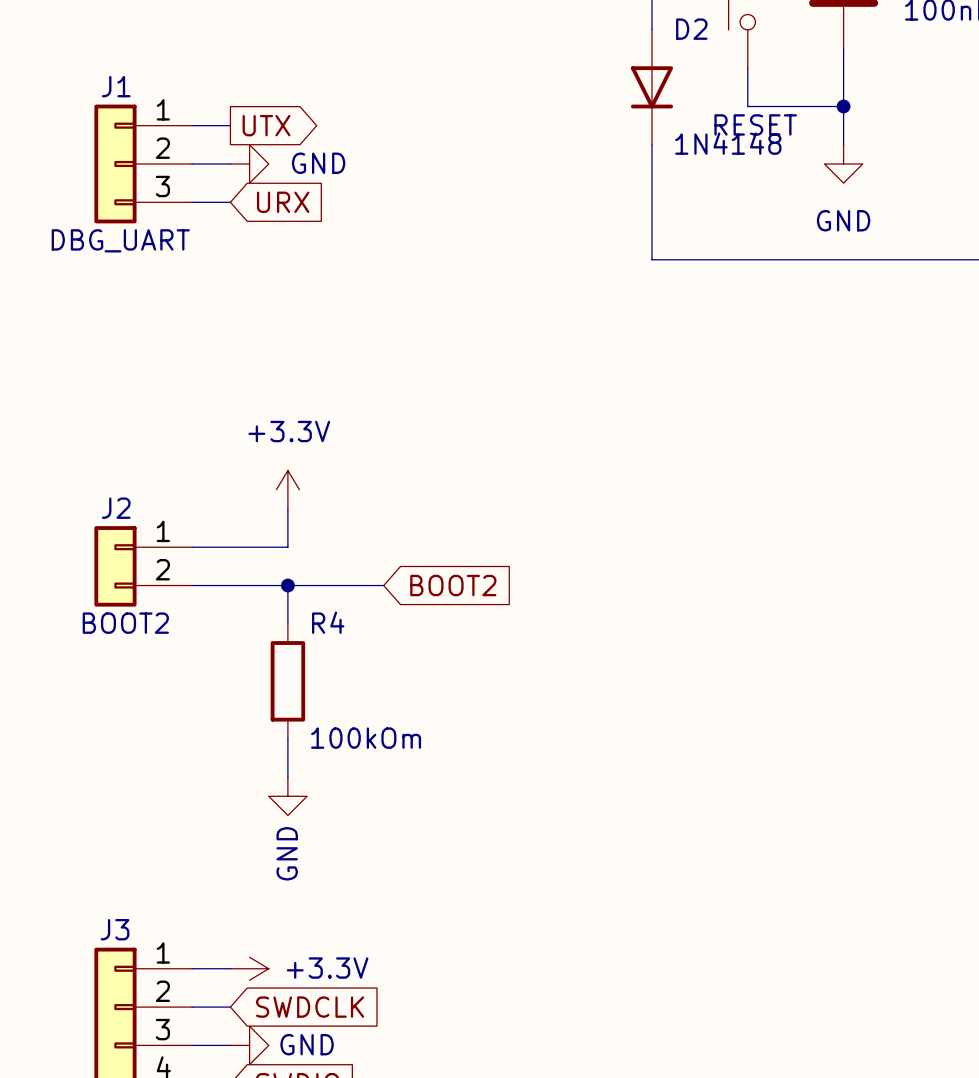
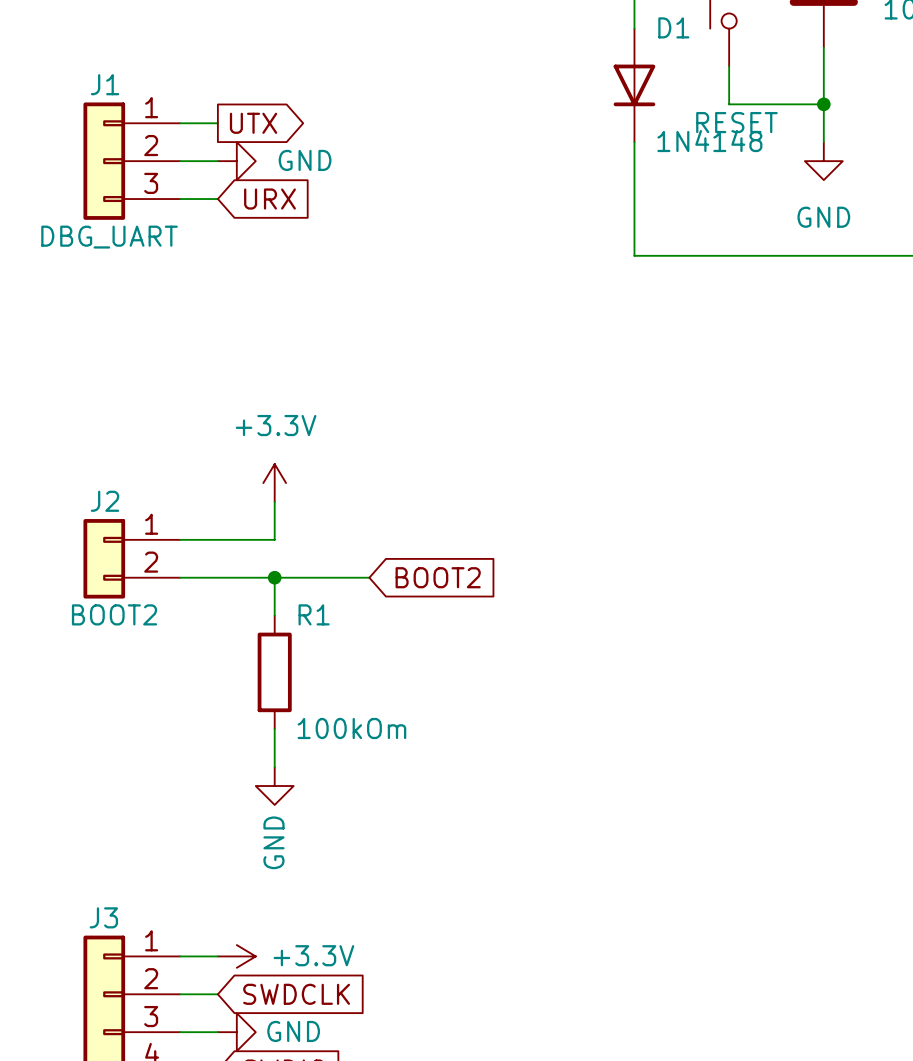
D2 name: D2 (691, 29) -> D1 (673, 27)
R4 name: R4 (328, 622) -> R1 (314, 614)

